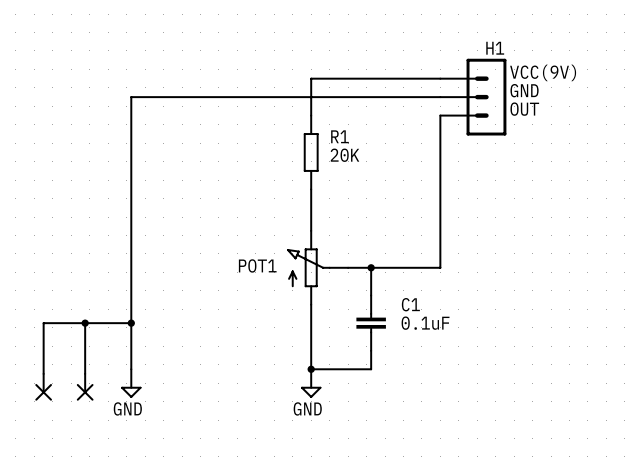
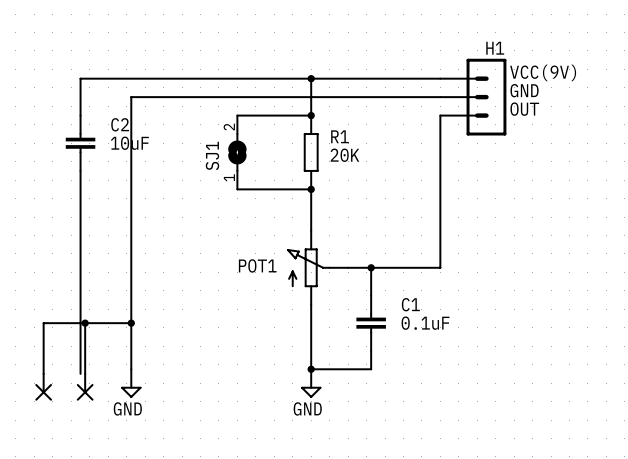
wire: none -> (311, 78) (80, 78) (80, 115)
junction: none -> (311, 78)
wire: none -> (237, 115) (311, 115)
junction: none -> (311, 115)
C2: none -> 10uF (80, 143)
SJ1: none -> (237, 152)
wire: none -> (80, 170) (80, 373)
wire: none -> (237, 189) (311, 189)
junction: none -> (311, 189)

